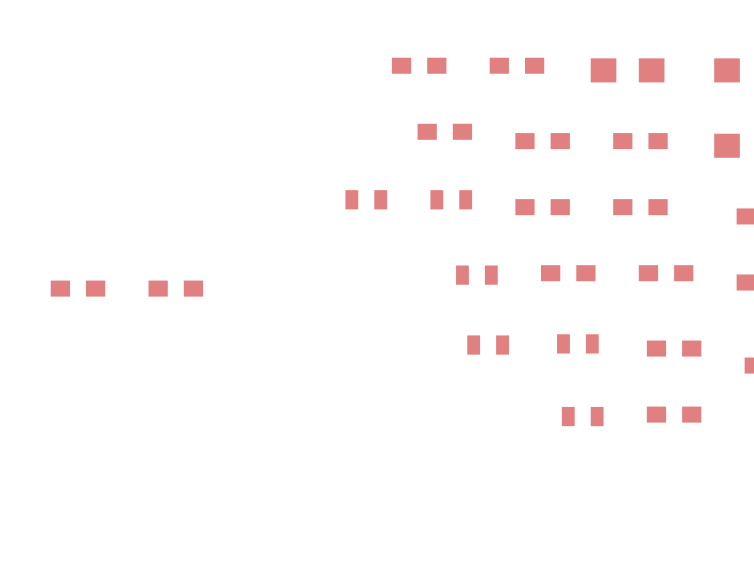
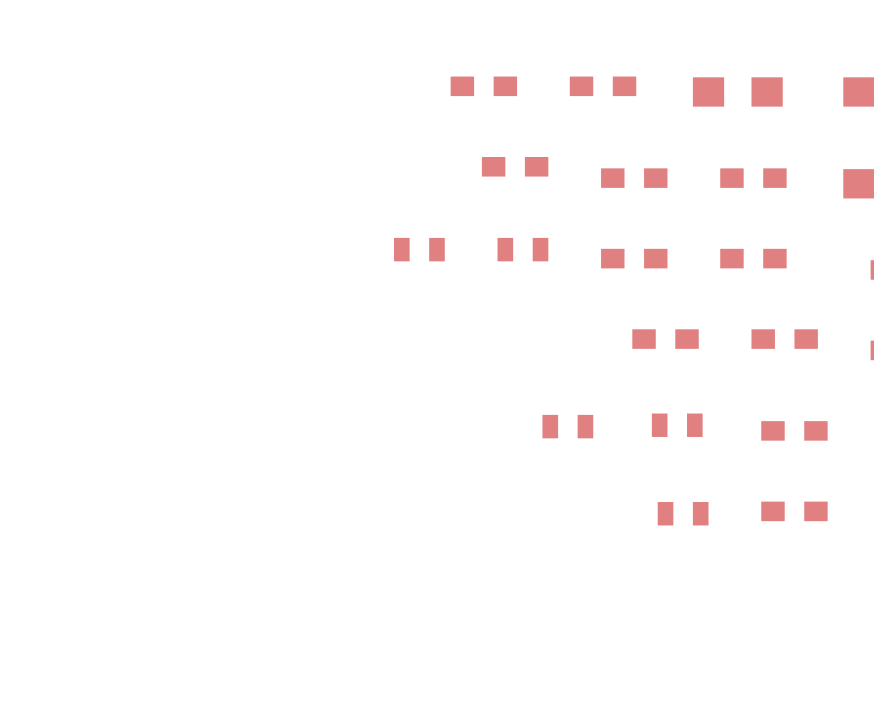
part: (476, 275) -> none
part: (77, 288) -> none
part: (175, 288) -> none

